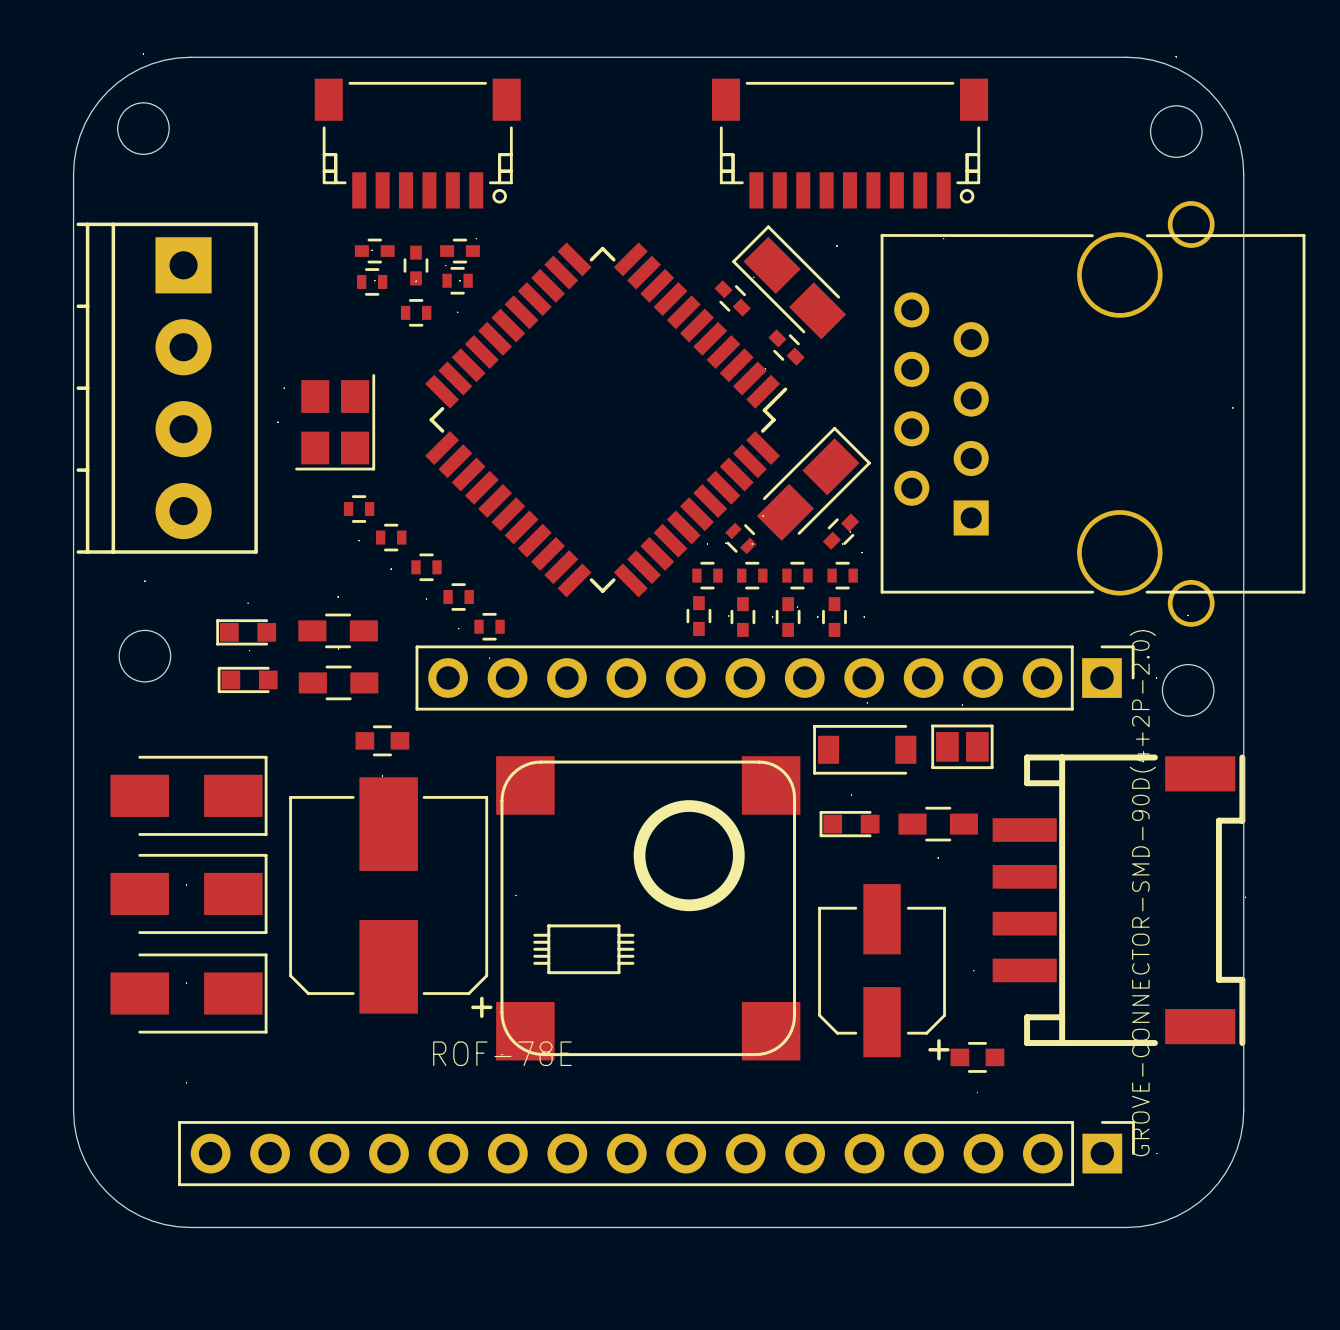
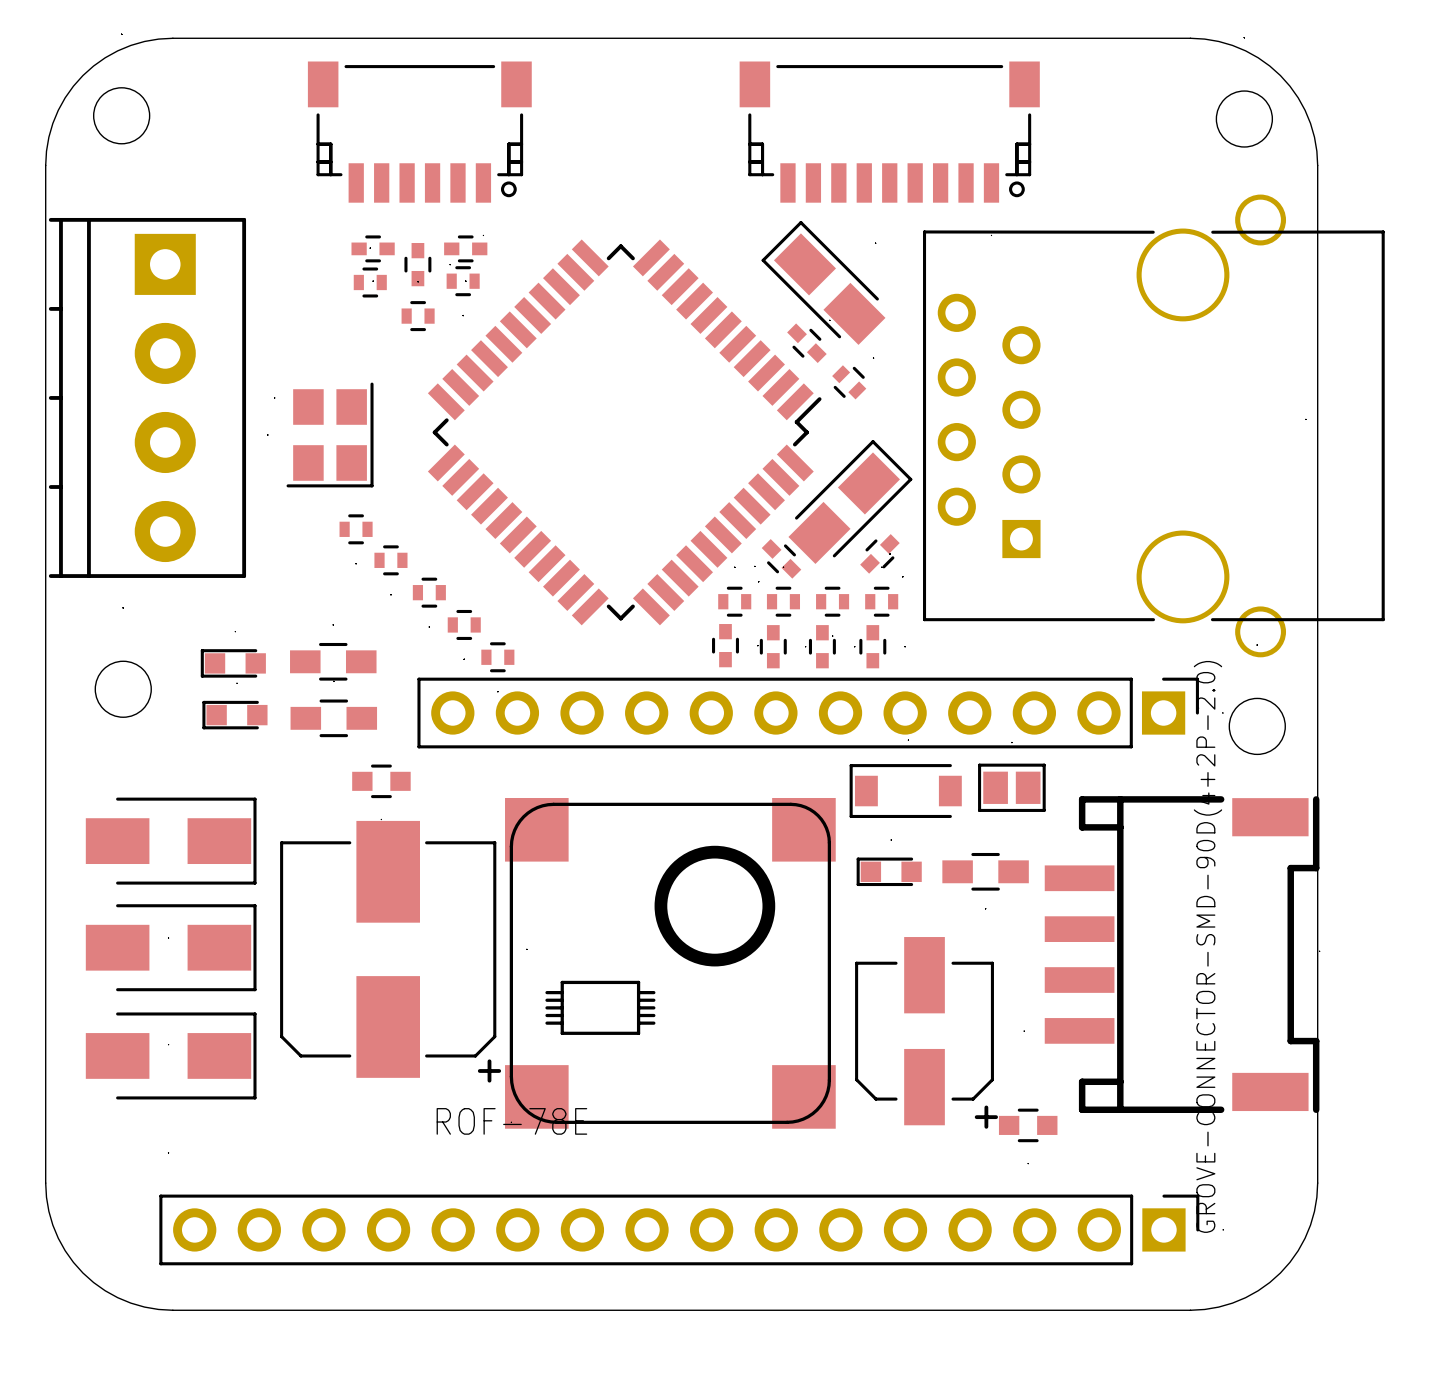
part position: (732, 298) -> (806, 343)
part position: (786, 347) -> (781, 558)
part position: (740, 538) -> (849, 382)

